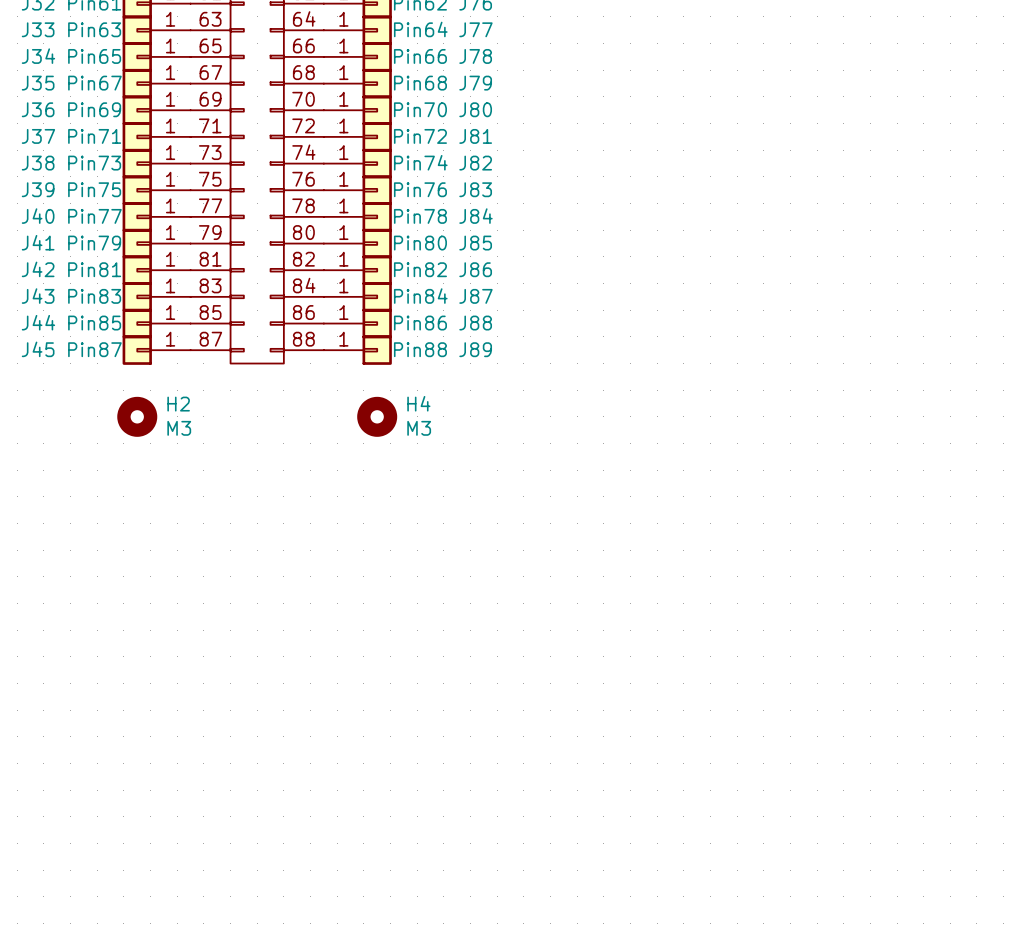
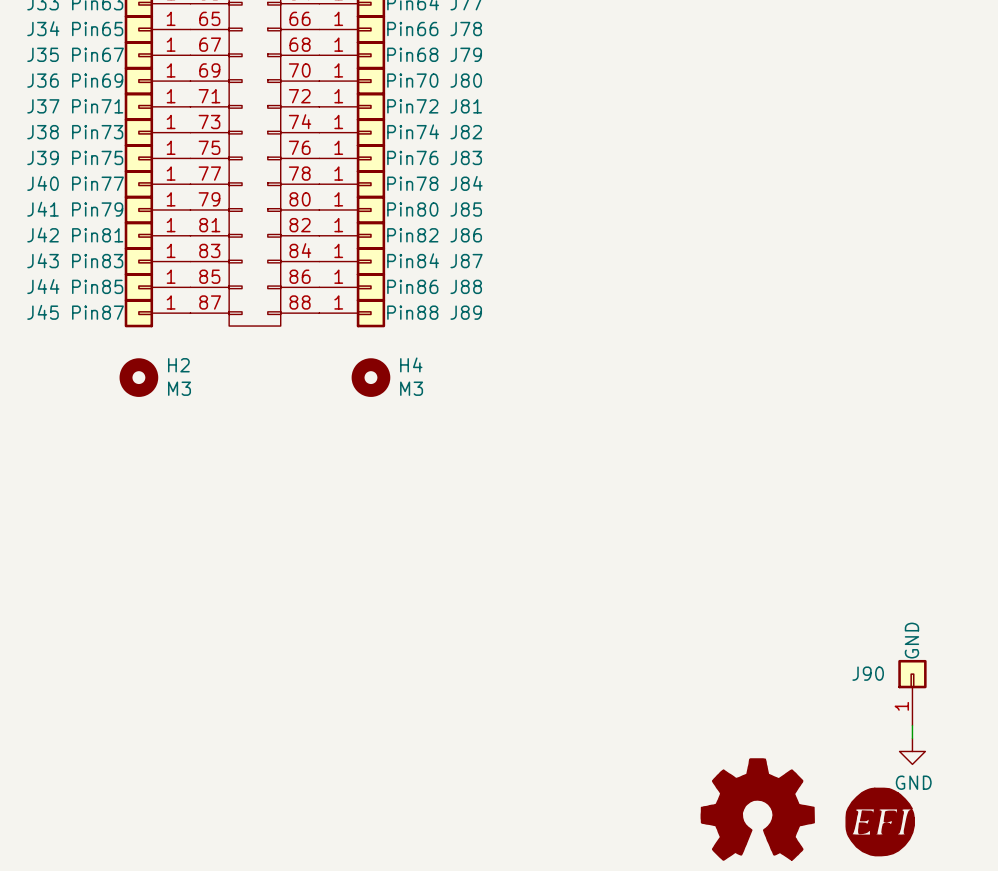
J90: none -> GND (912, 692)
wire: none -> (912, 725) (912, 738)
power symbol: none -> GND (912, 751)
part: none -> (757, 809)
part: none -> (880, 822)

